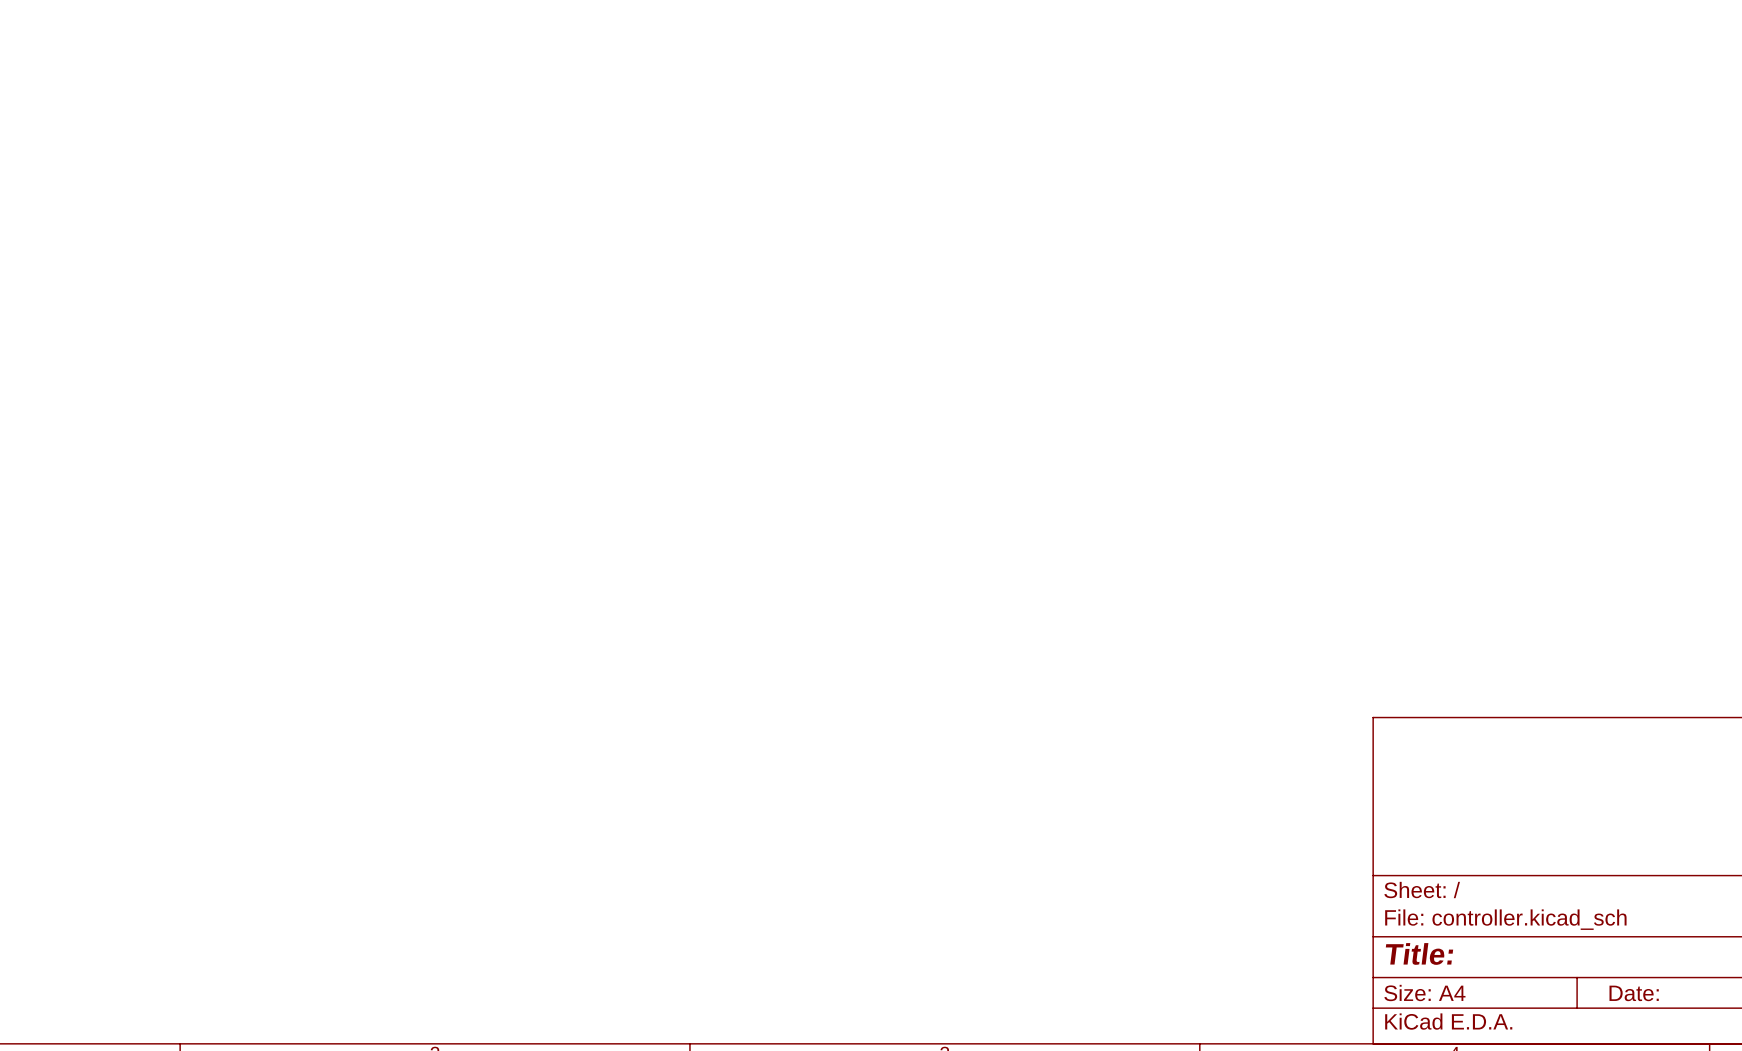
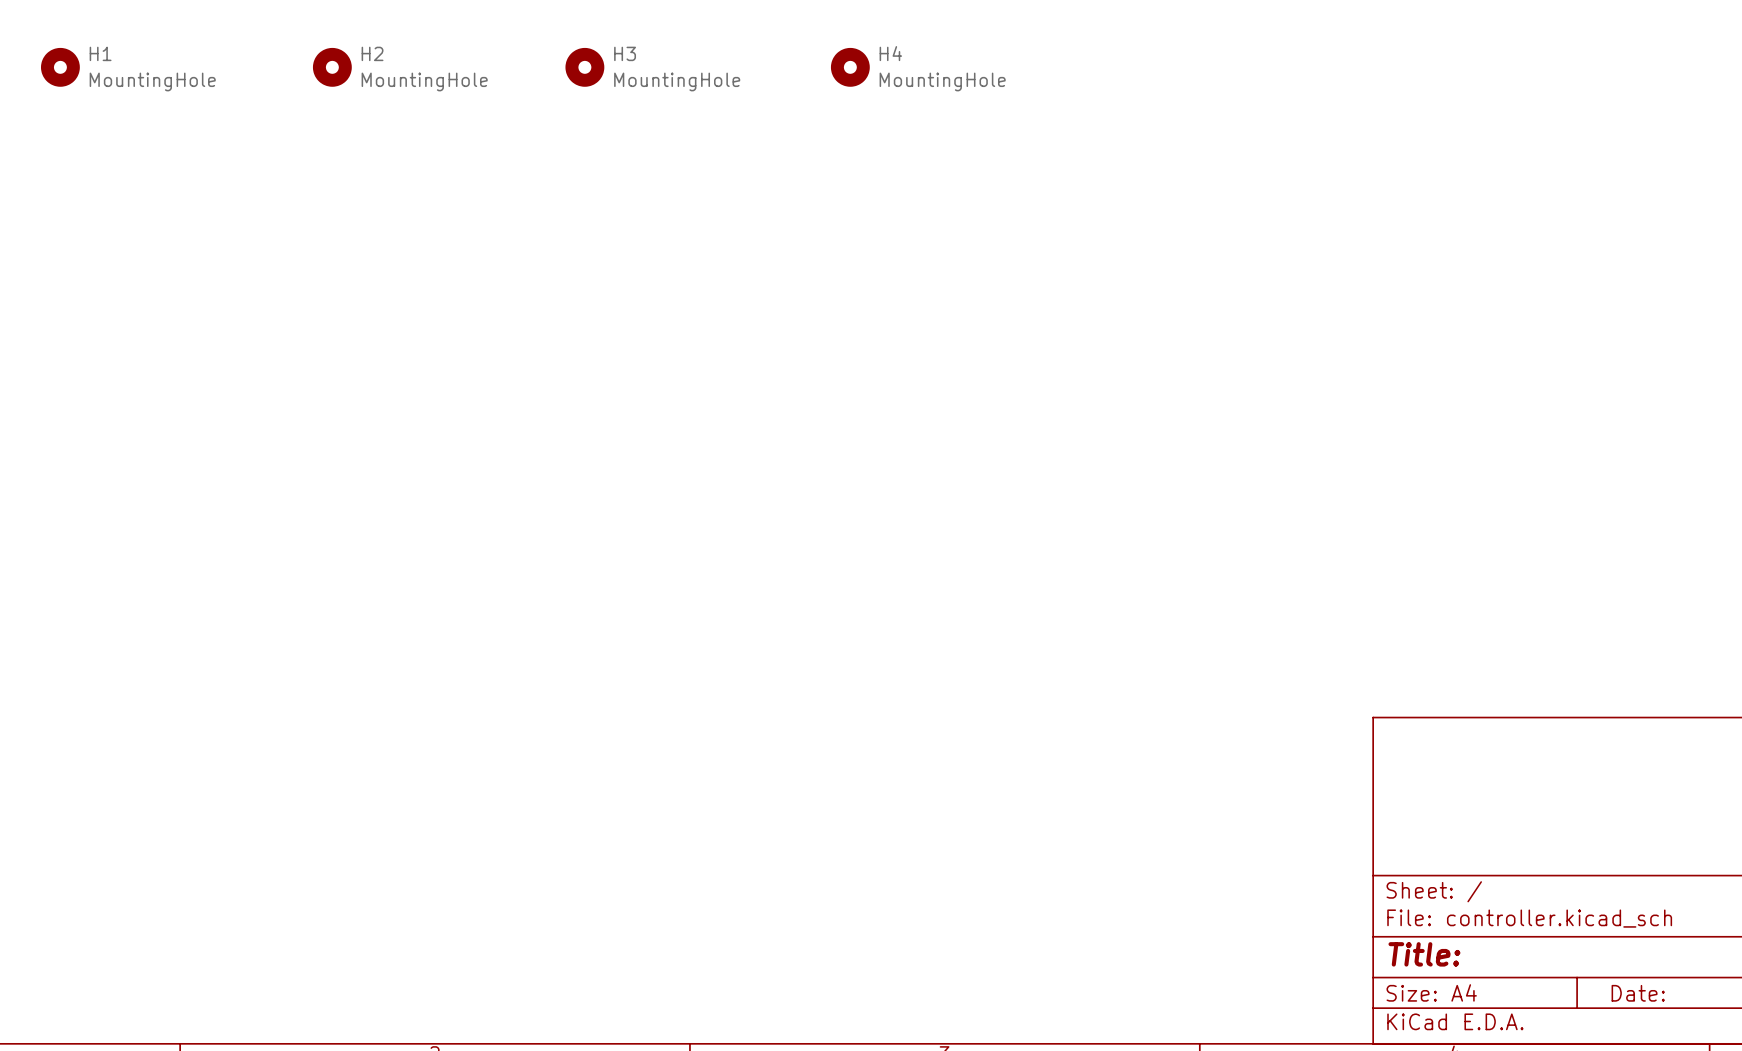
H1: none -> MountingHole (60, 67)
H2: none -> MountingHole (332, 67)
H3: none -> MountingHole (584, 67)
H4: none -> MountingHole (850, 67)

